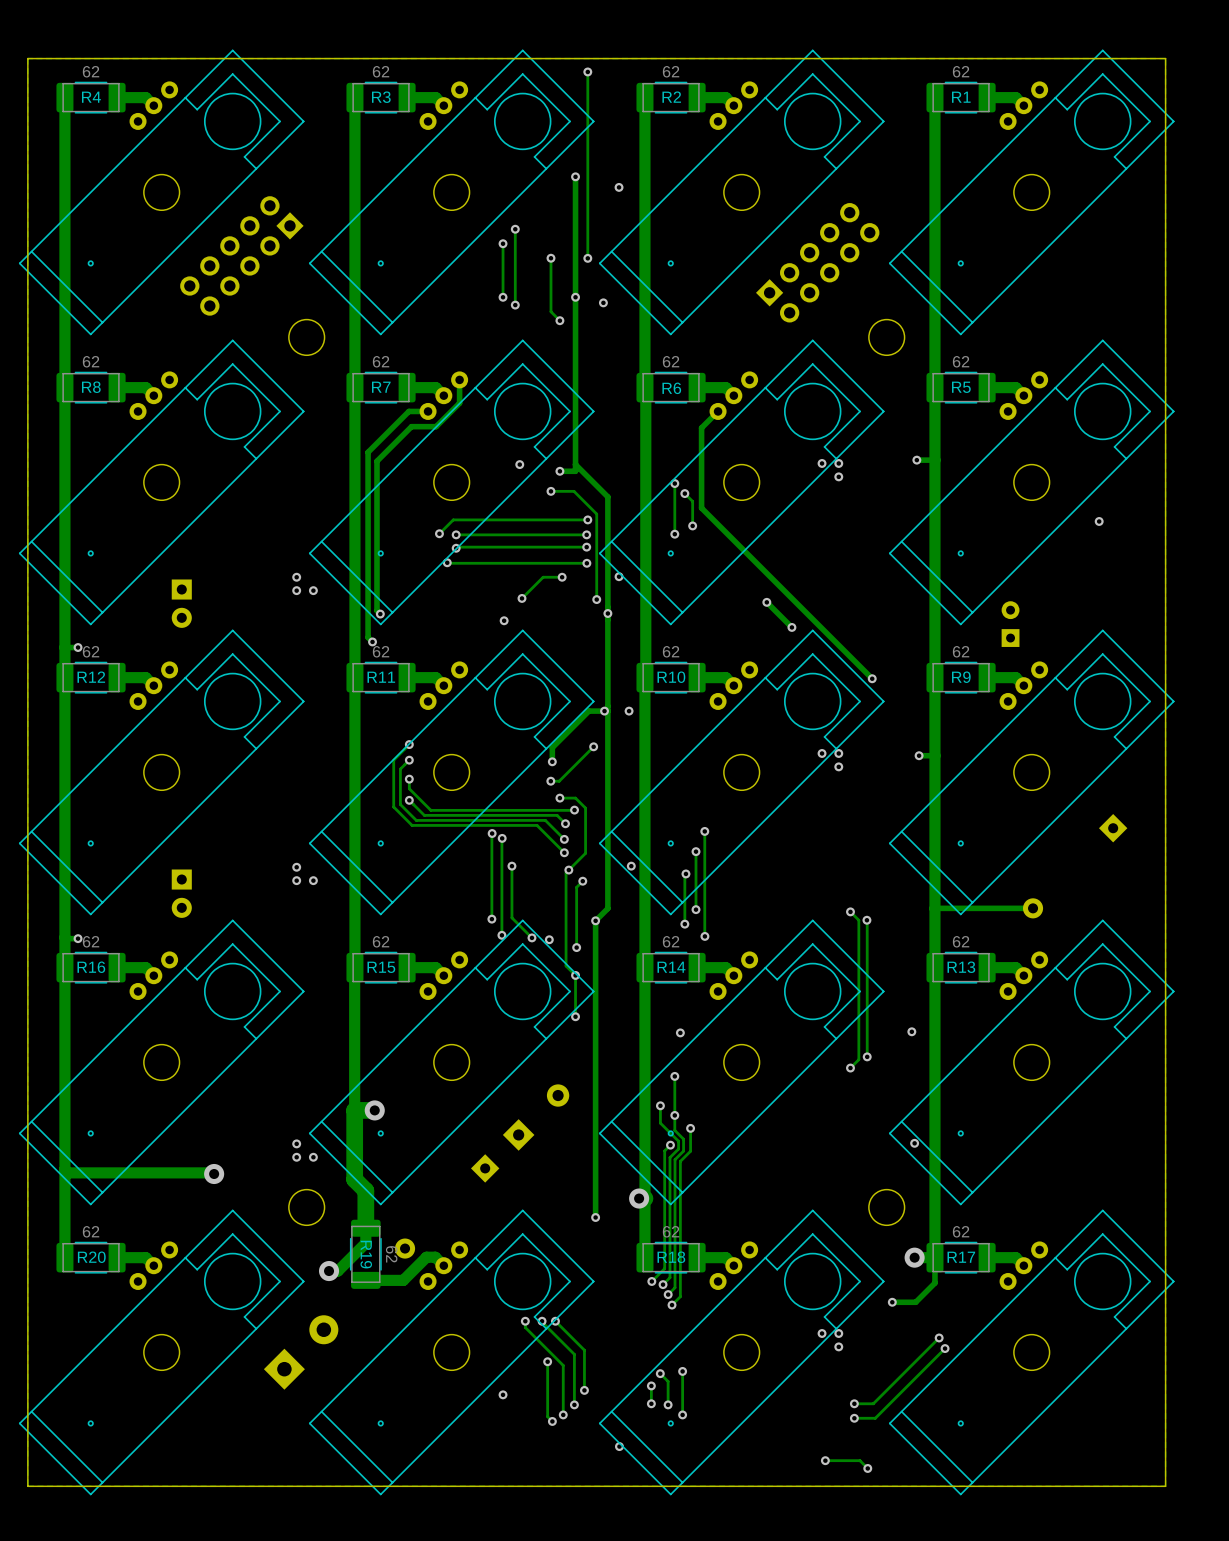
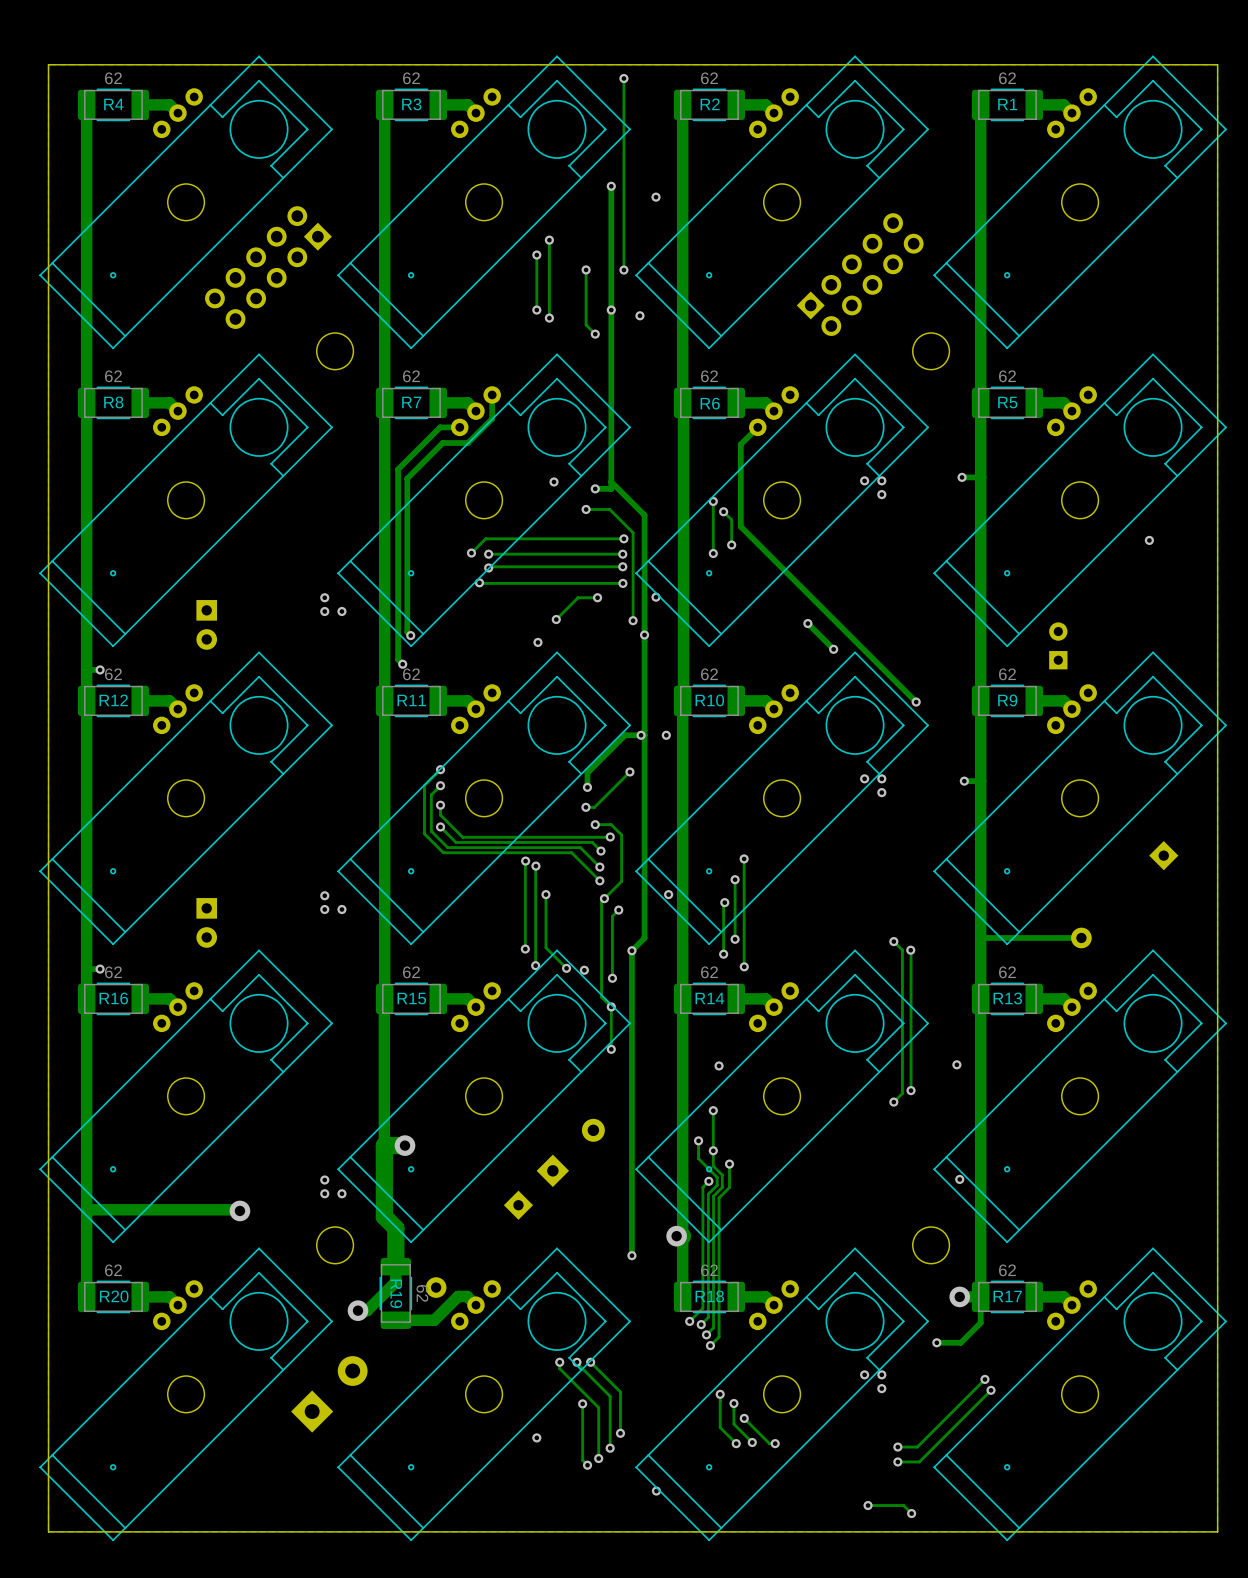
track: none -> (720, 1394) (720, 1427) (736, 1443)
via: none -> (720, 1394)
track: none -> (733, 1403) (733, 1424) (752, 1442)
via: none -> (733, 1403)
track: (682, 1371) (682, 1414) -> none
via: (682, 1371) -> none
track: (660, 1373) (668, 1381) (668, 1404) -> none
via: (660, 1373) -> none
track: none -> (744, 1418) (769, 1443) (775, 1443)
via: none -> (744, 1418)
track: (651, 1385) (651, 1403) -> none
via: (651, 1385) -> none
via: none -> (752, 1442)
via: none -> (736, 1443)
via: none -> (775, 1443)
via: (651, 1403) -> none
via: (668, 1404) -> none
via: (682, 1414) -> none

